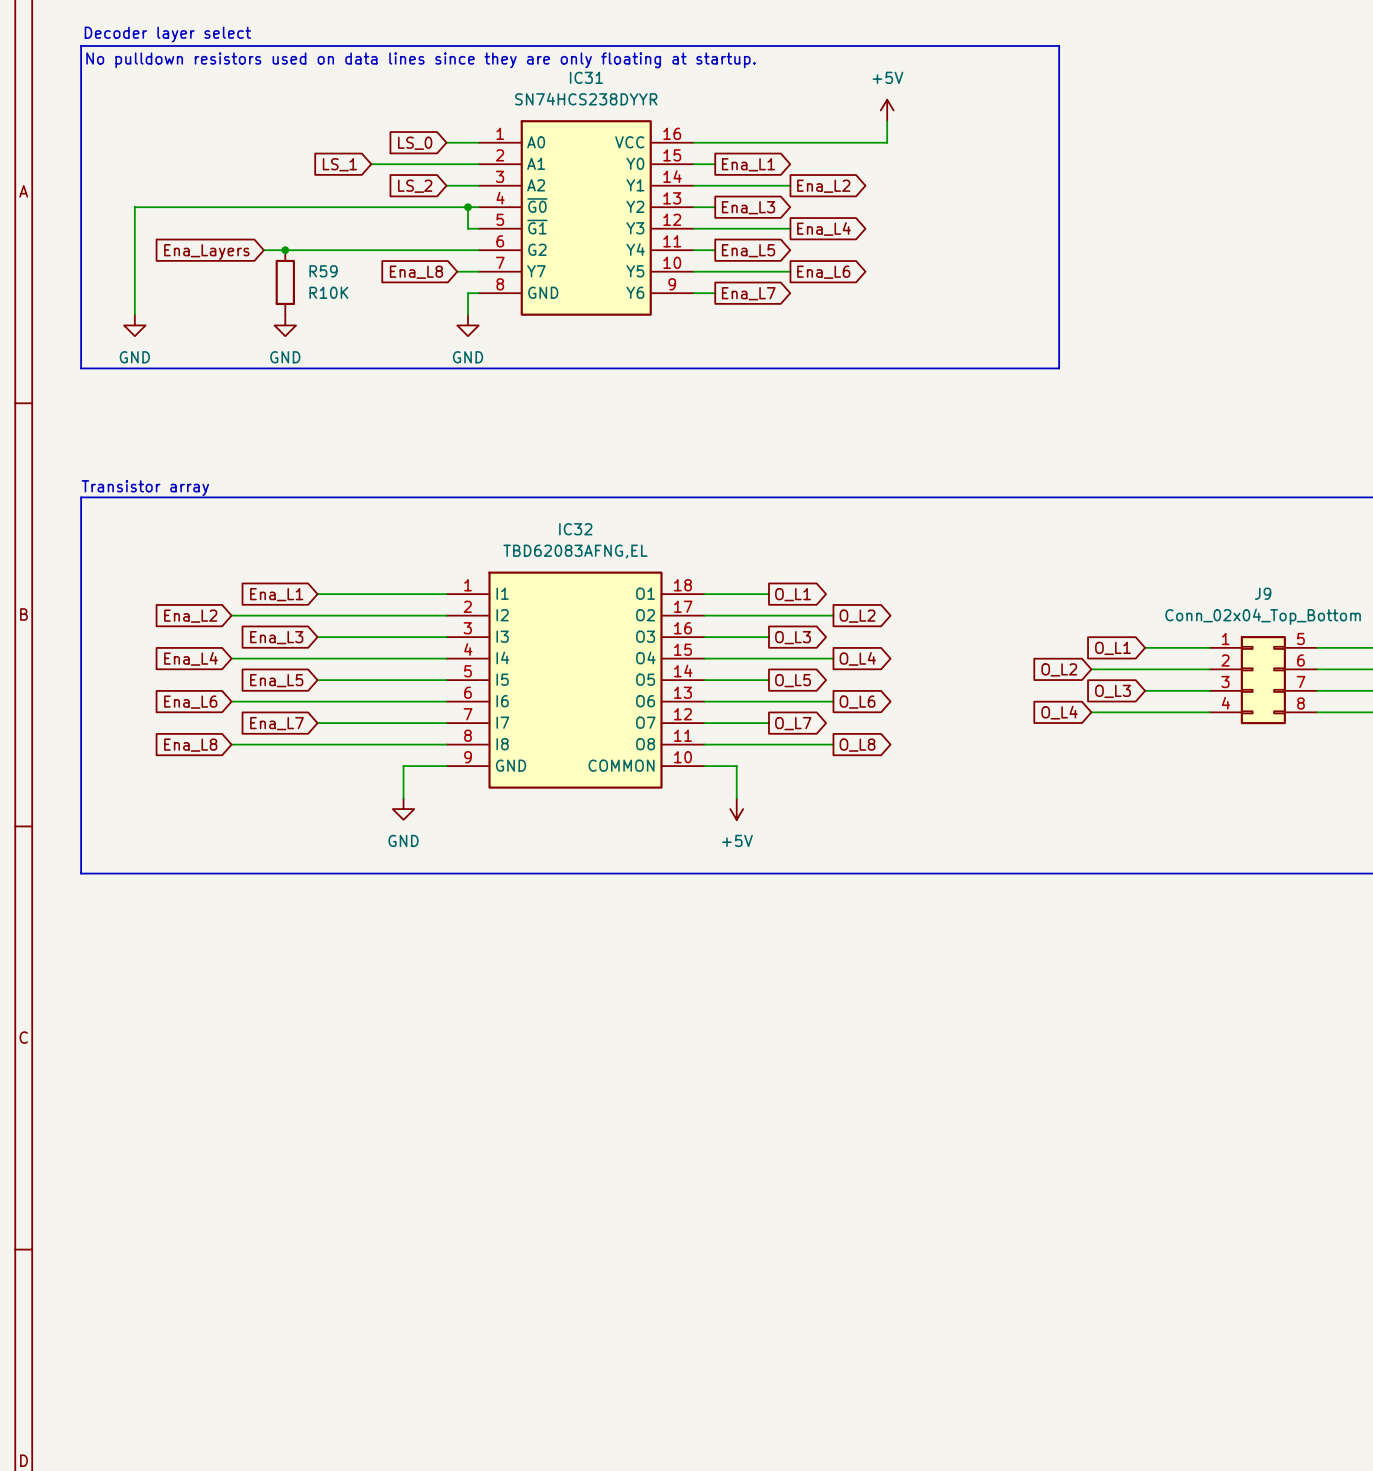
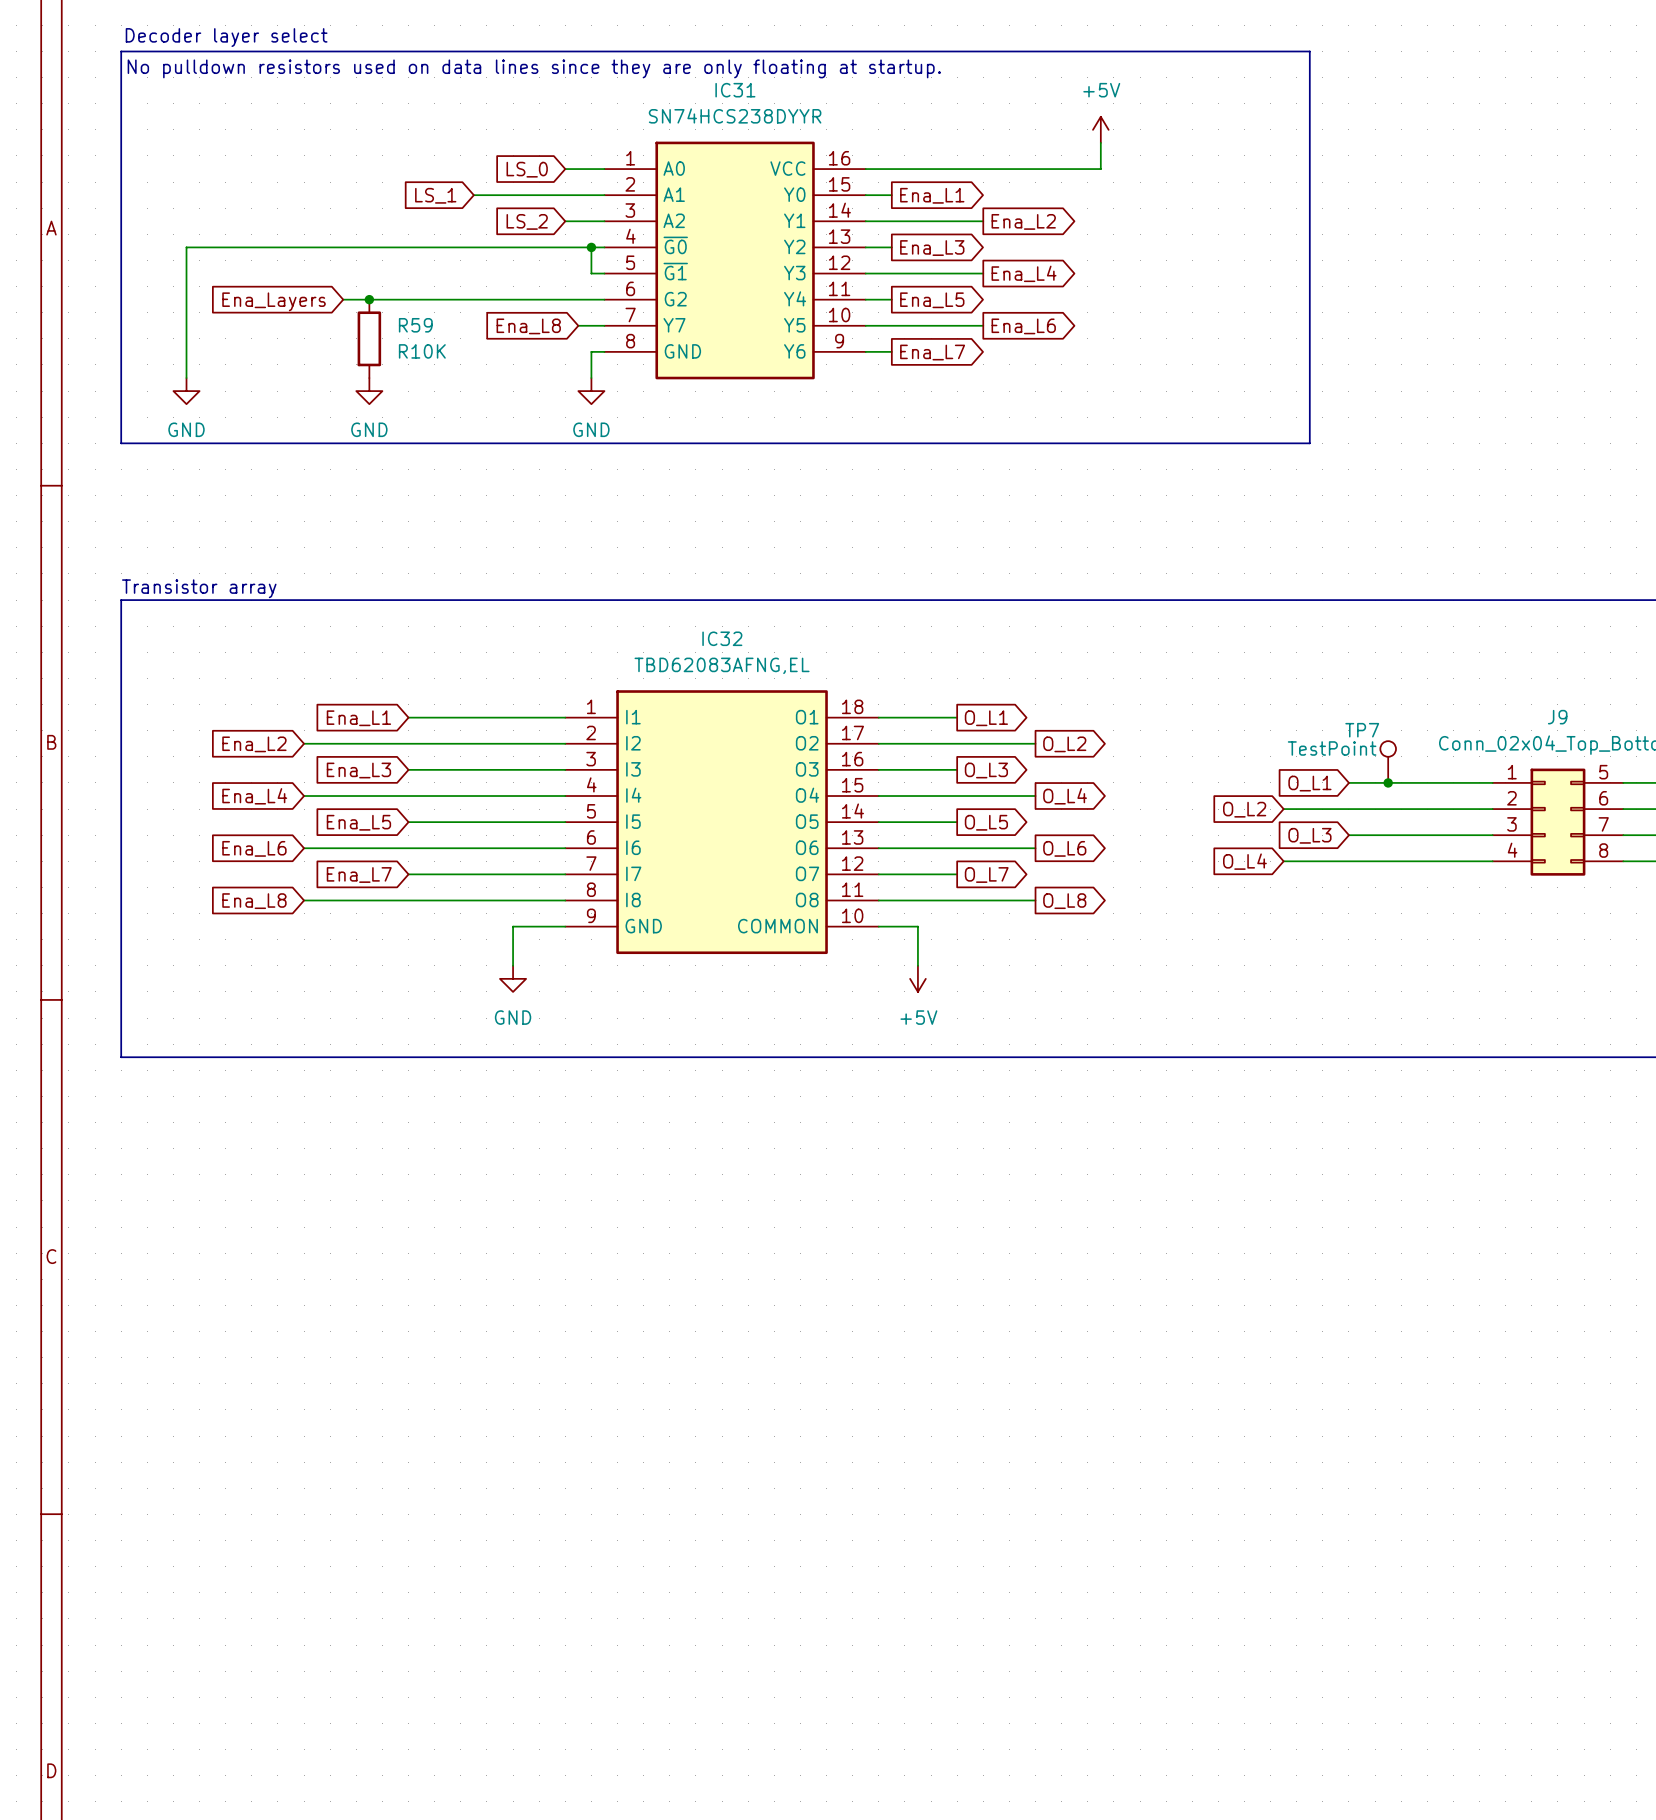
TP7: none -> TestPoint (1388, 762)
wire: none -> (1348, 782) (1414, 782)
junction: none -> (1388, 782)
global label position: O_L1 (1113, 648) -> O_L1 (1309, 783)
wire: none -> (1283, 809) (1348, 809)
global label position: O_L2 (1059, 669) -> O_L2 (1244, 809)
wire: none -> (1348, 835) (1414, 835)
global label position: O_L3 (1113, 691) -> O_L3 (1309, 835)
wire: none -> (1283, 861) (1348, 861)
global label position: O_L4 (1059, 712) -> O_L4 (1244, 861)

